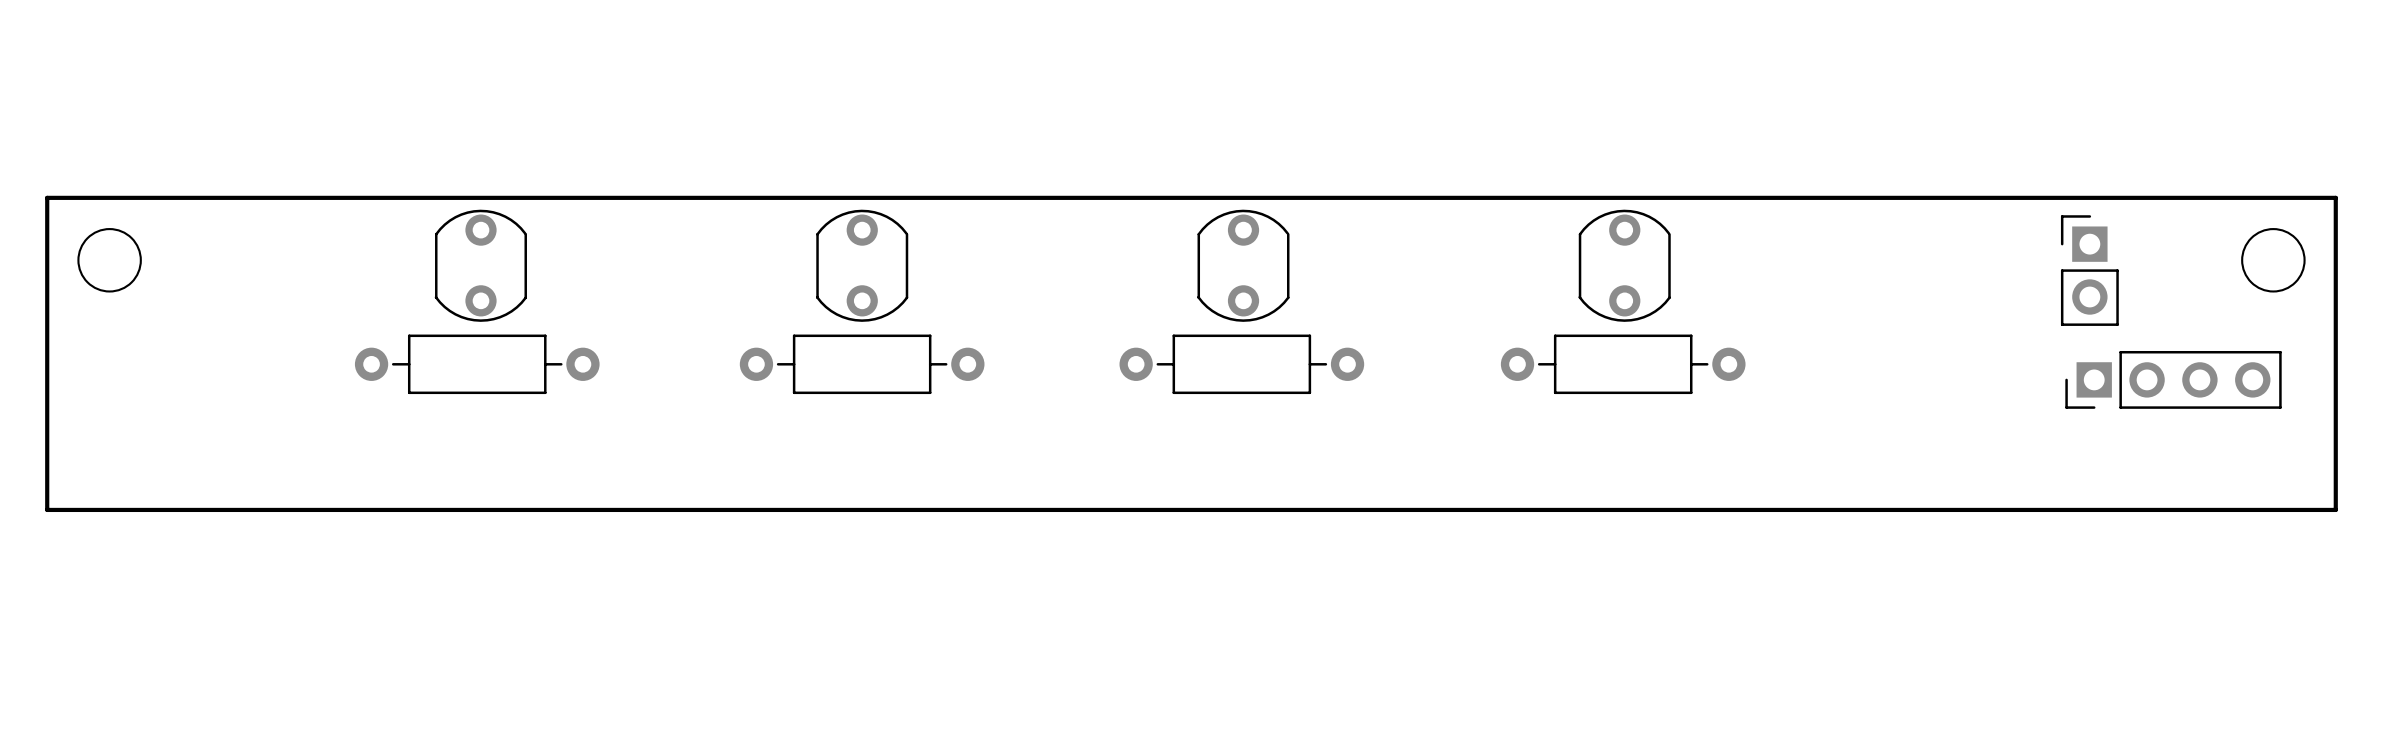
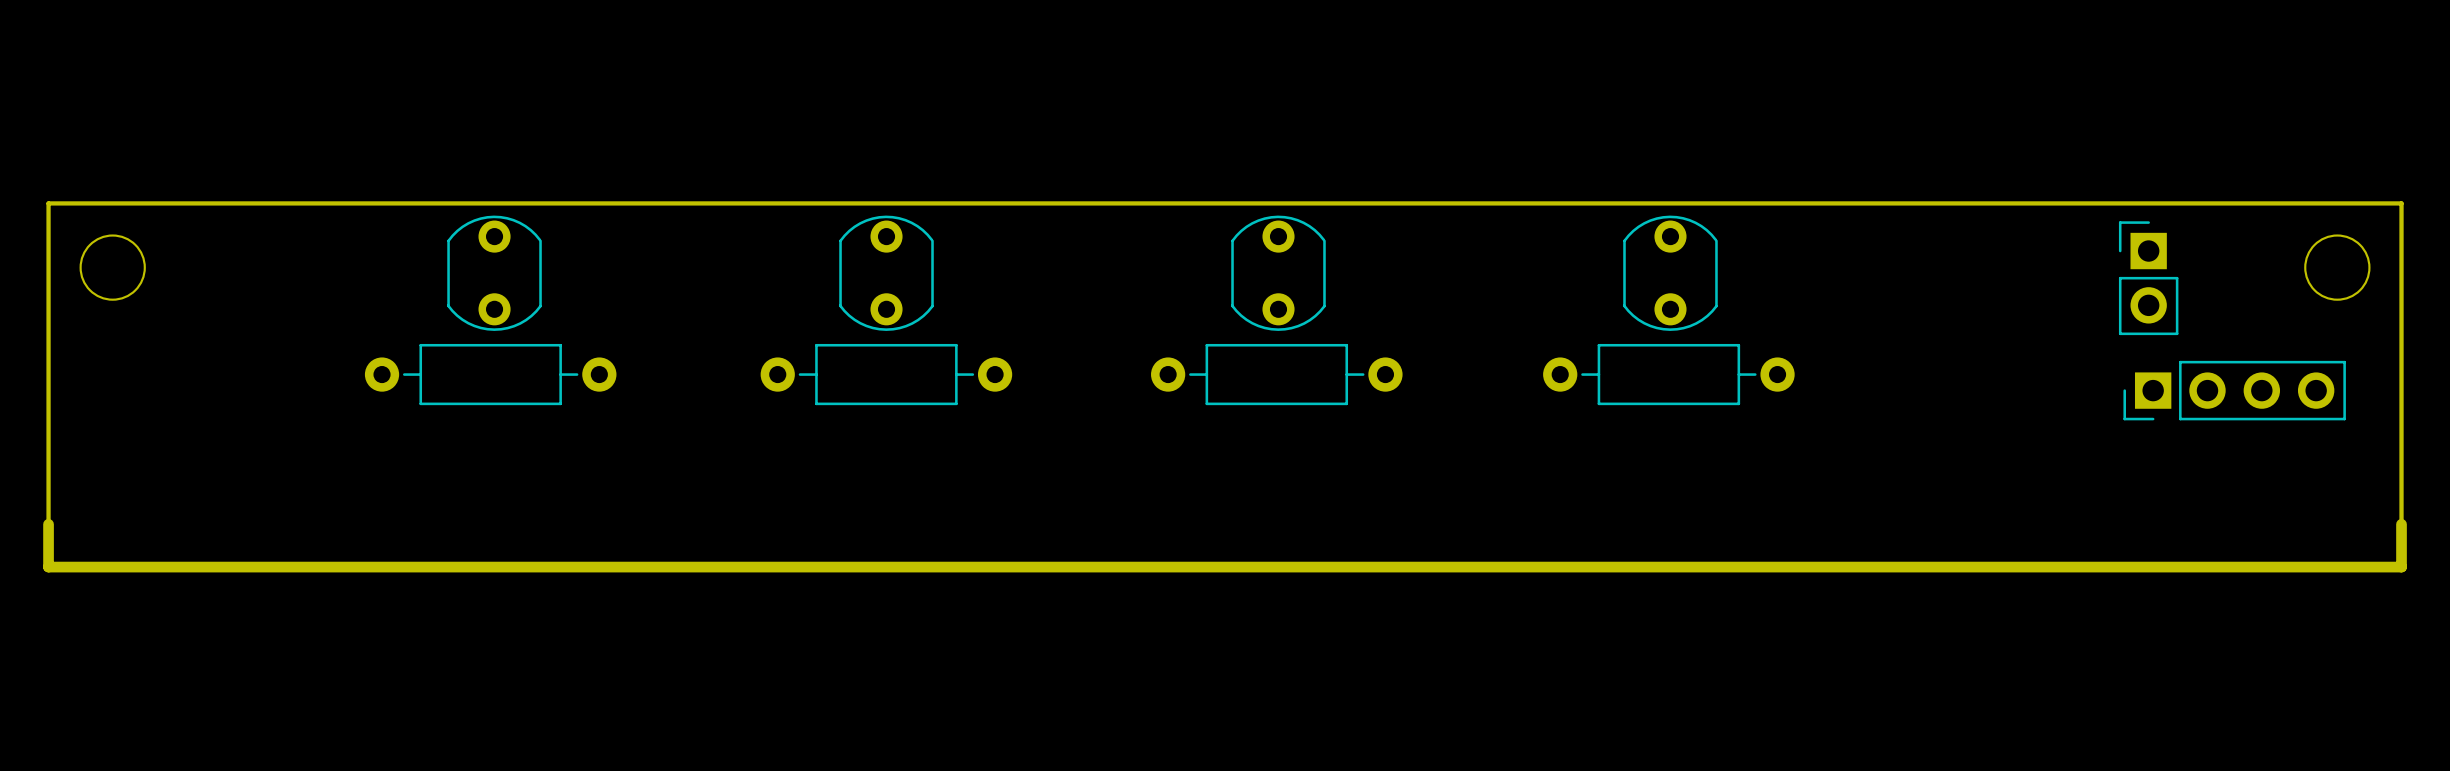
board edge: (2335, 509) (47, 509) -> (2401, 524) (2401, 567) (48, 567) (48, 524)

